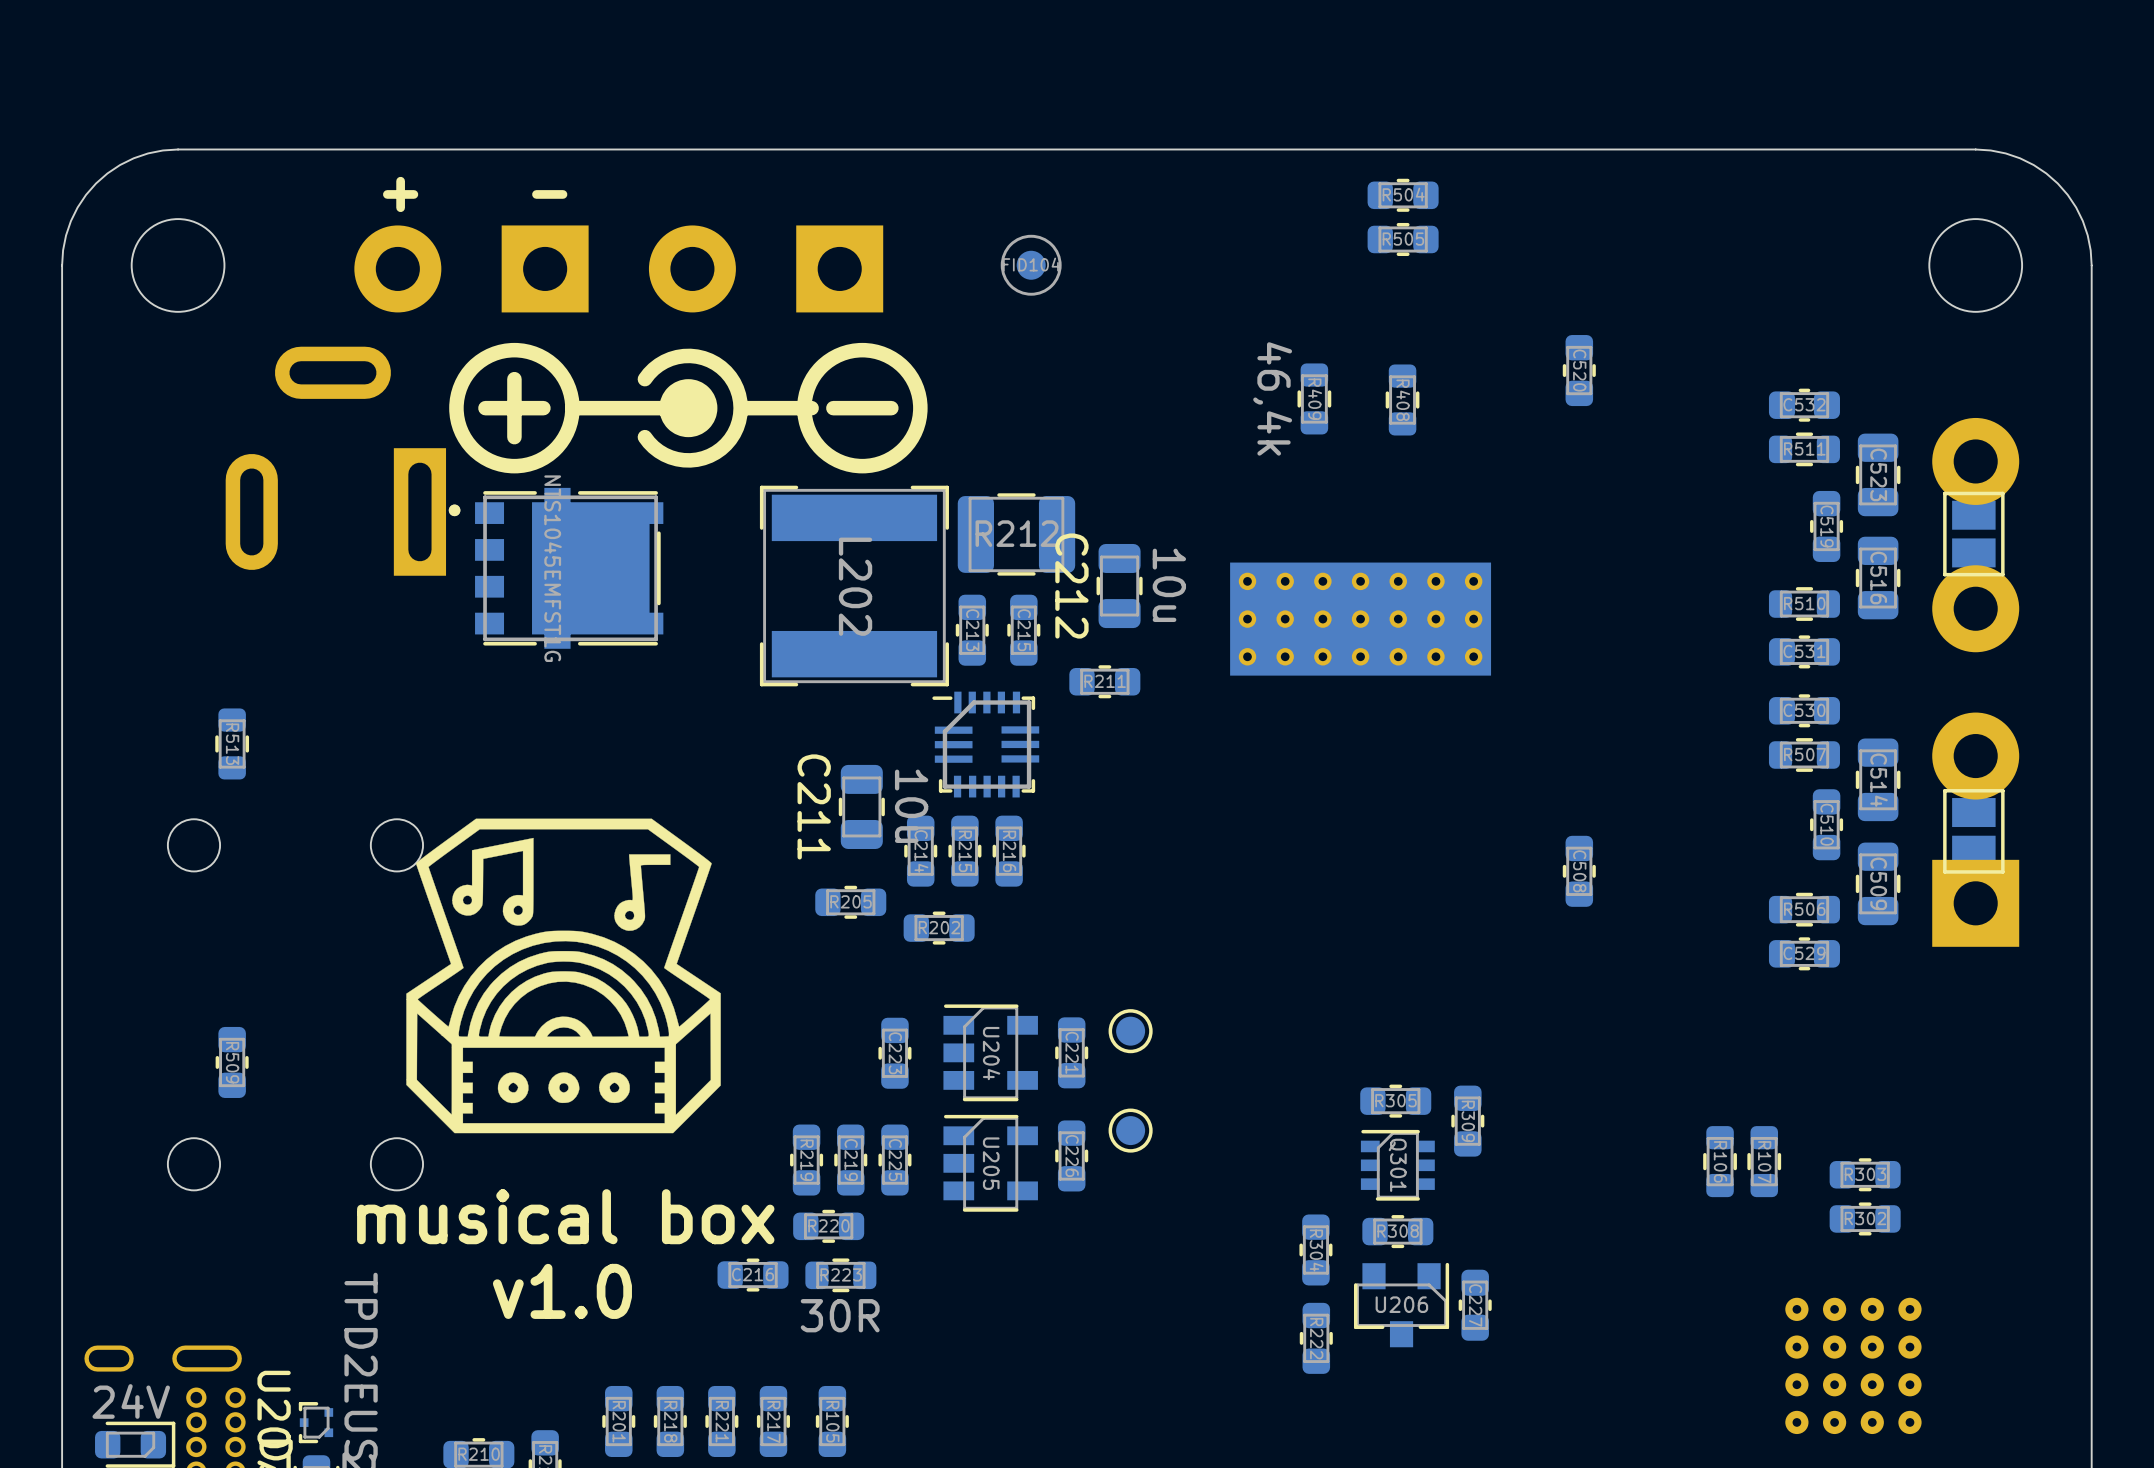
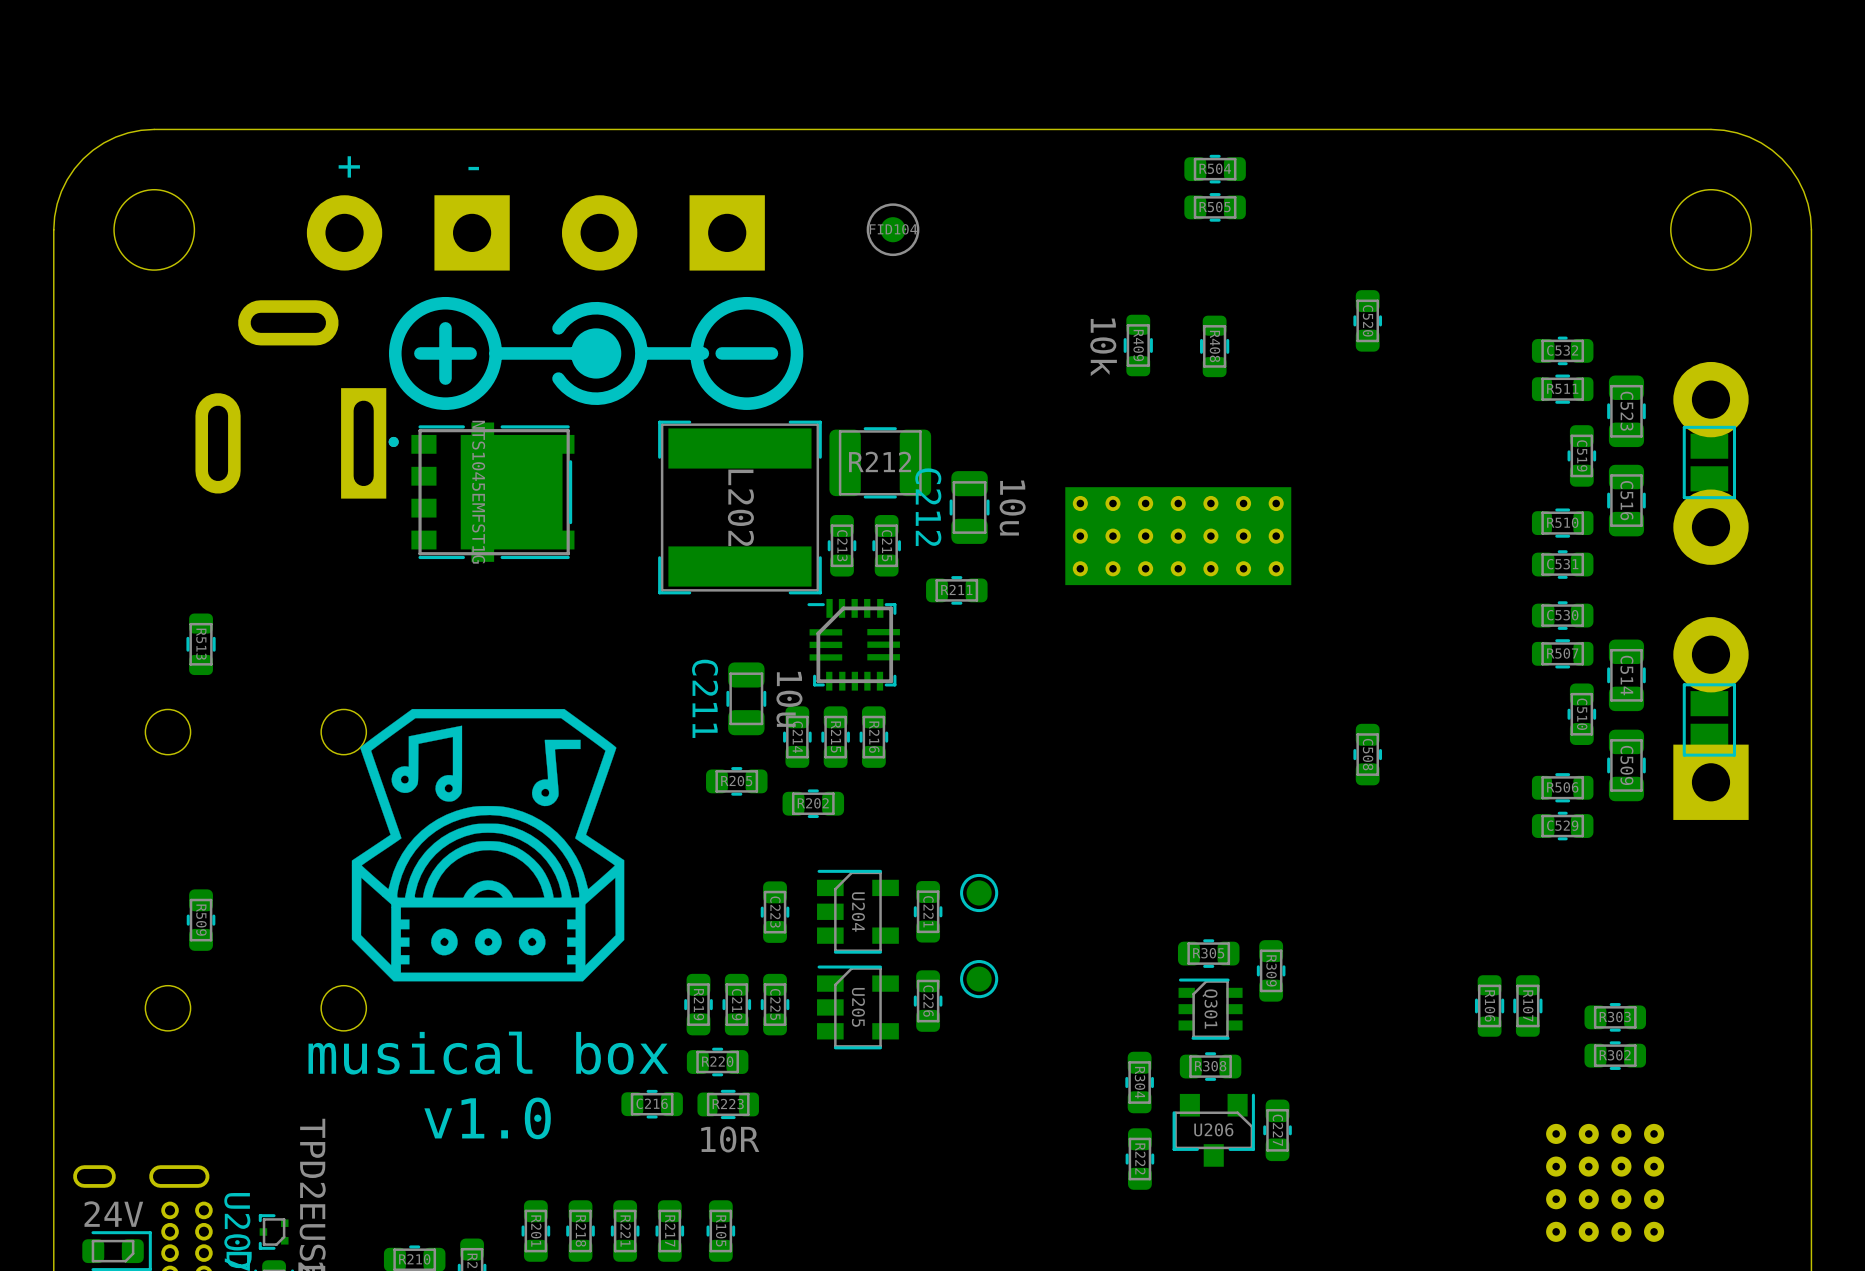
R409 value: 46,4k (1272, 398) -> 10k (1103, 347)
R223 value: 30R (840, 1315) -> 10R (730, 1139)

